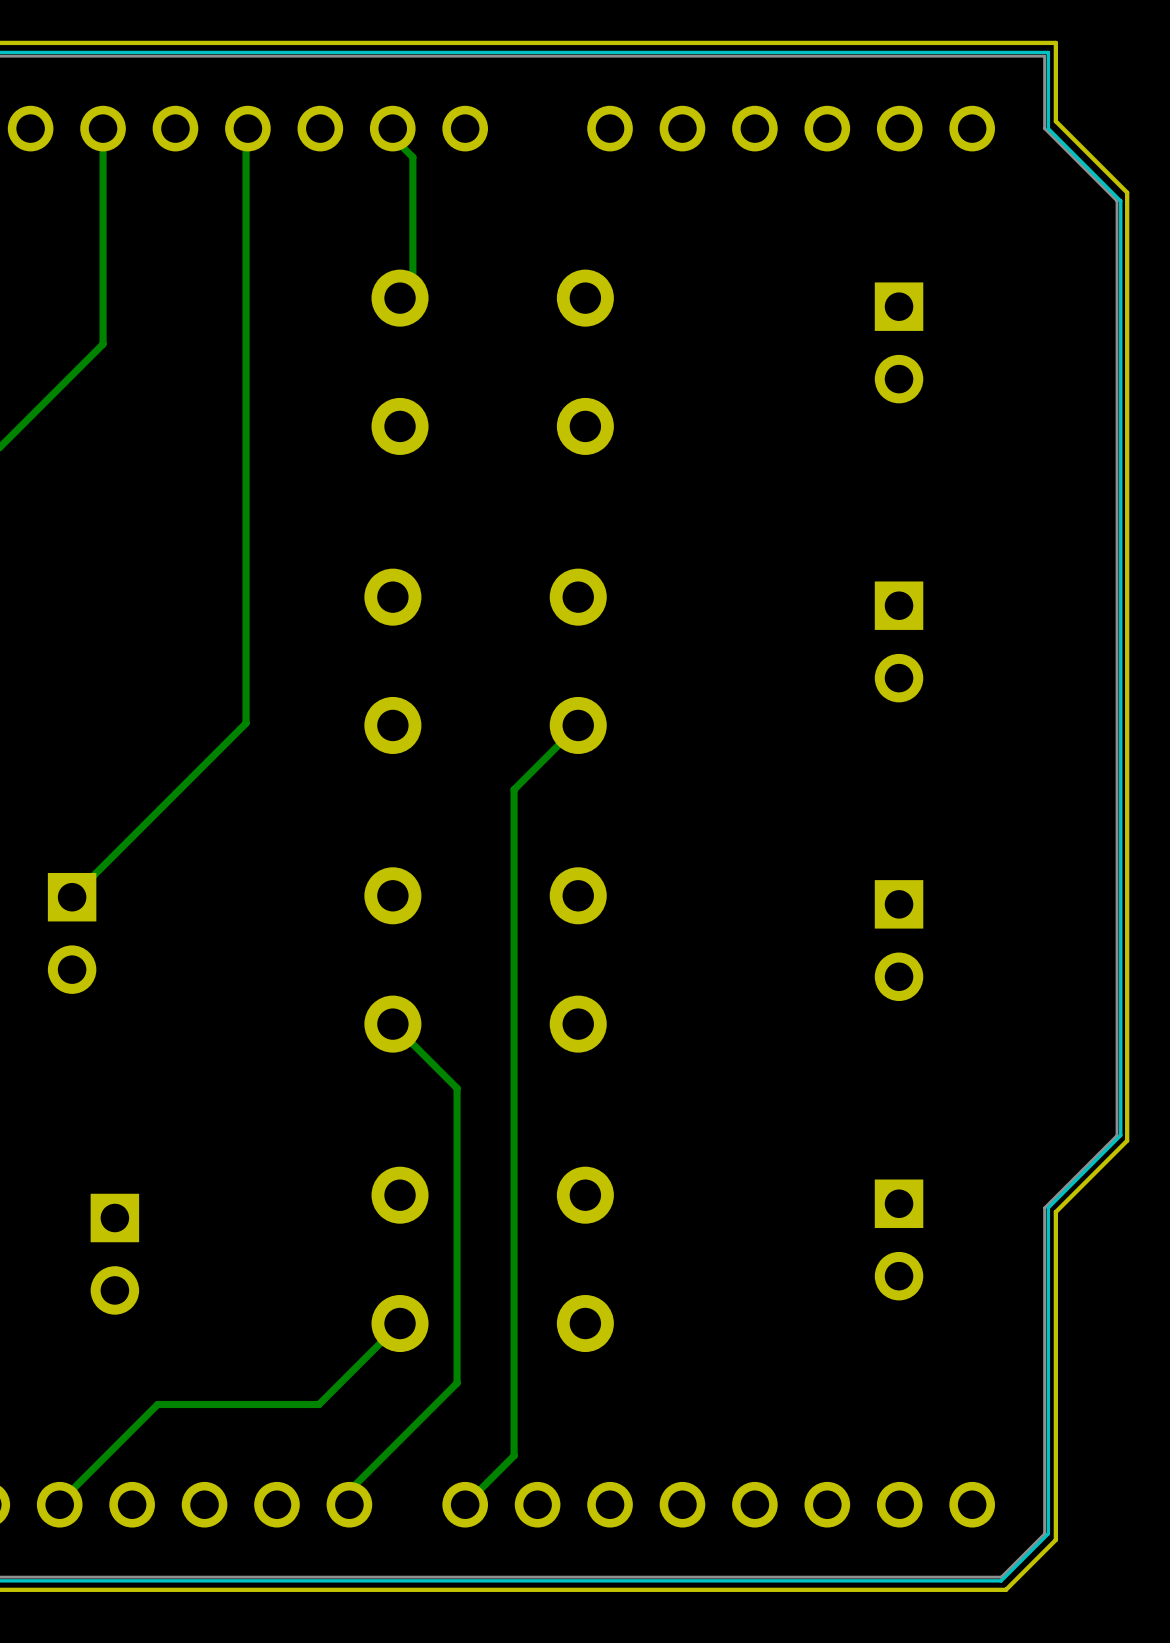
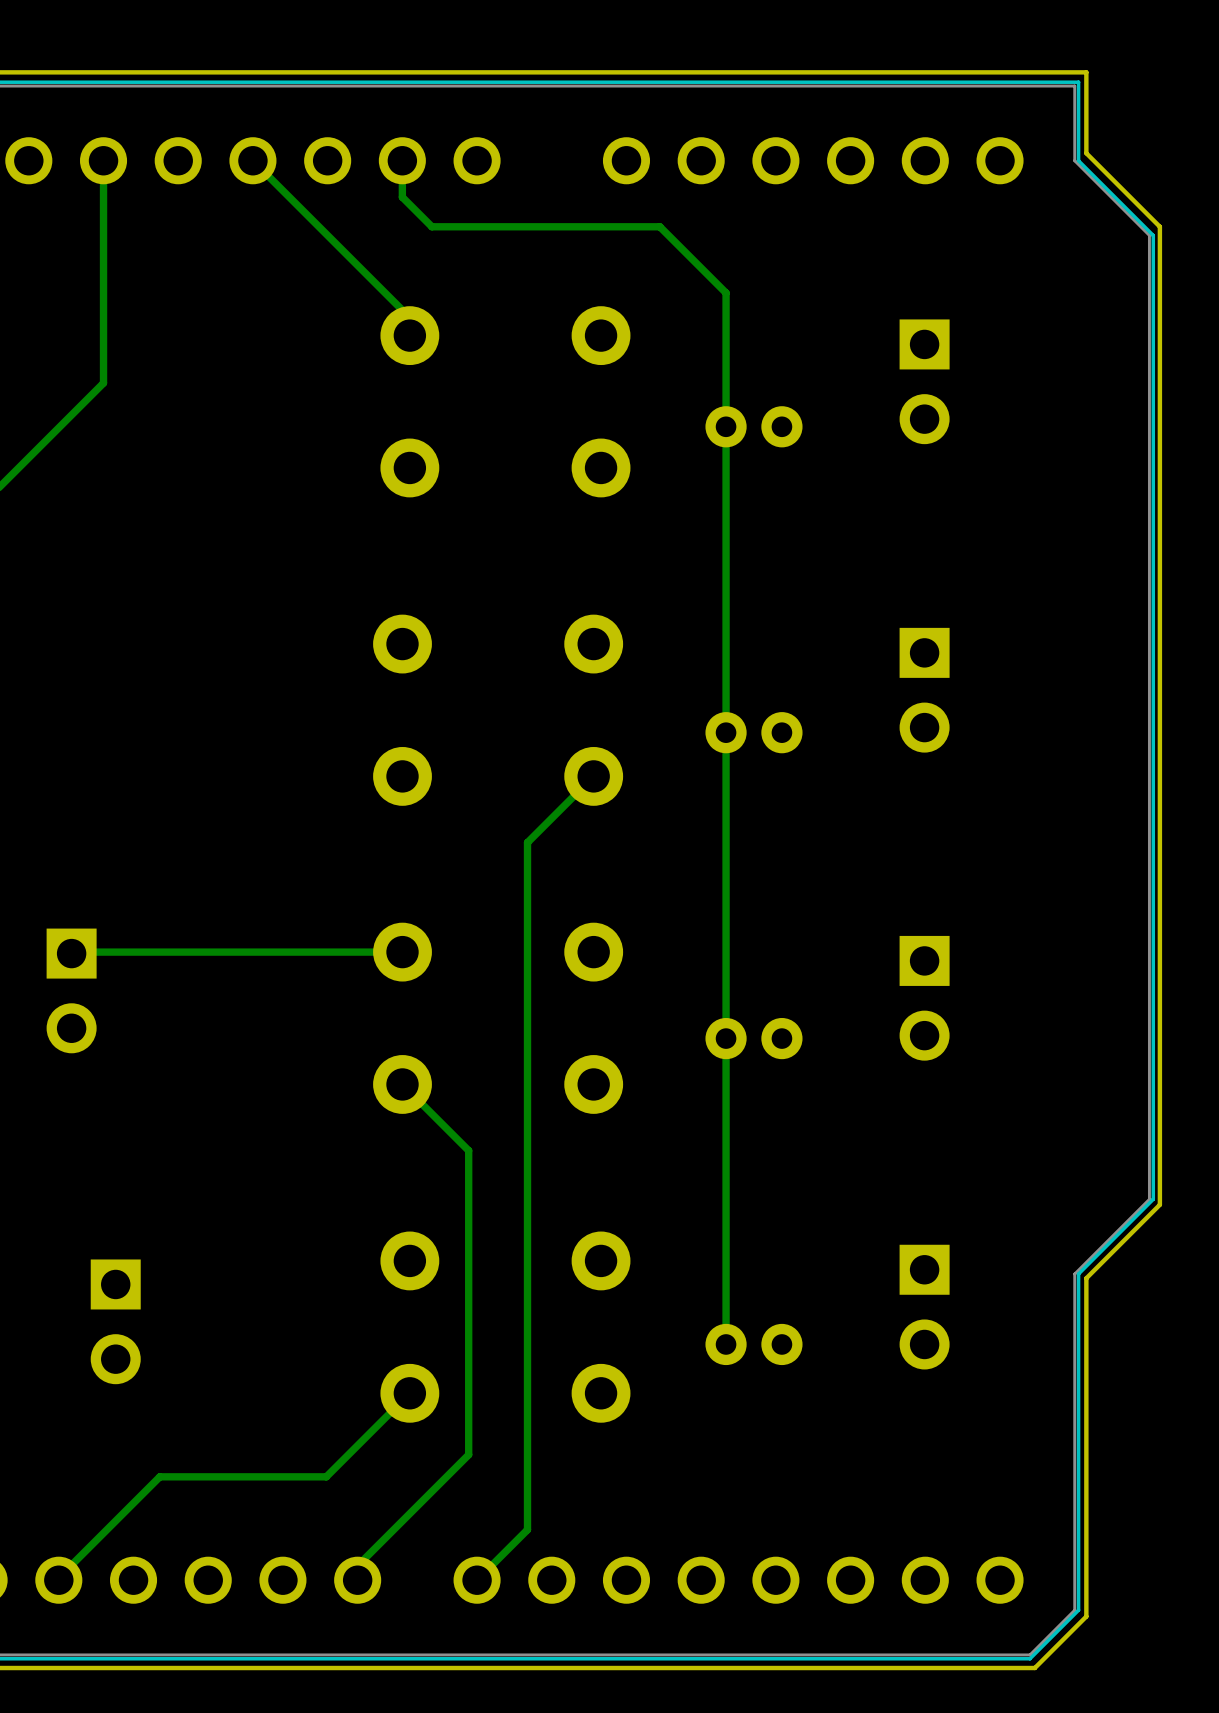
track: (247, 128) (246, 130) (246, 723) (73, 895) -> (252, 160) (409, 317)
track: (392, 128) (382, 129) (385, 129) (412, 157) (412, 298) -> (402, 160) (402, 197) (431, 226) (659, 226) (726, 292) (726, 1344)
part: none -> (753, 426)
part: none -> (753, 732)
track: none -> (402, 952) (73, 952)
part: none -> (753, 1038)
part: none -> (753, 1344)

